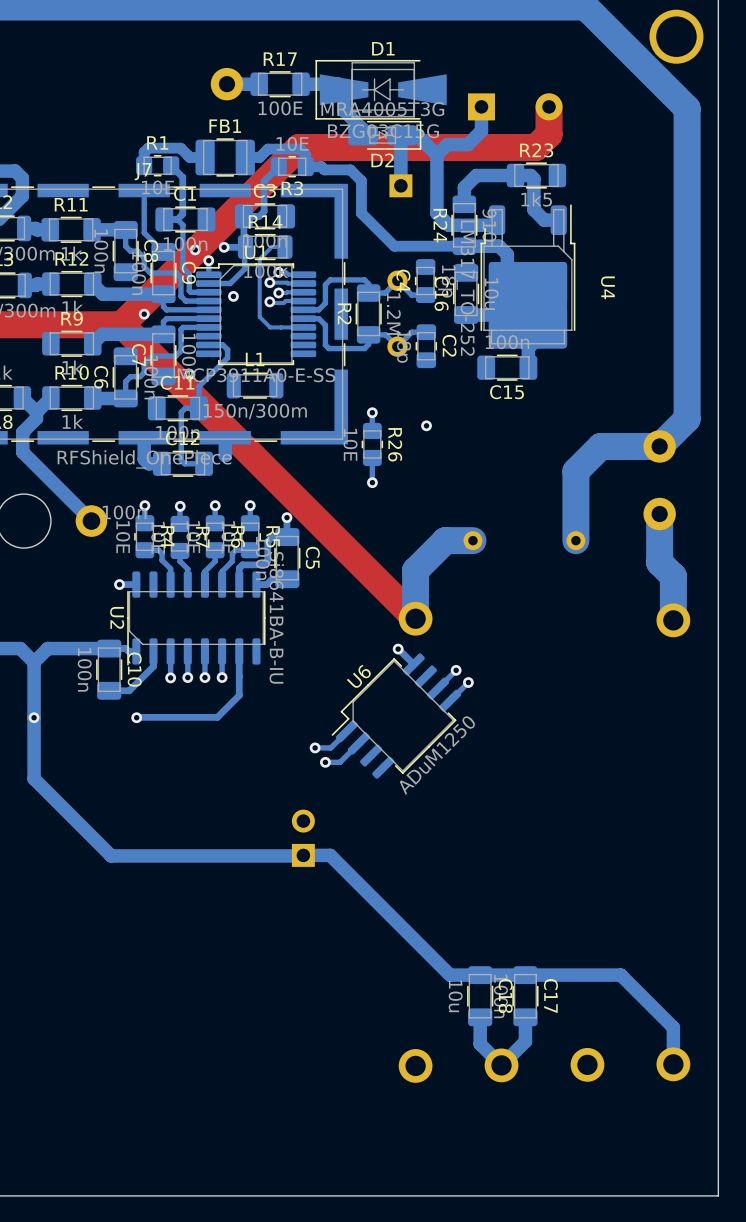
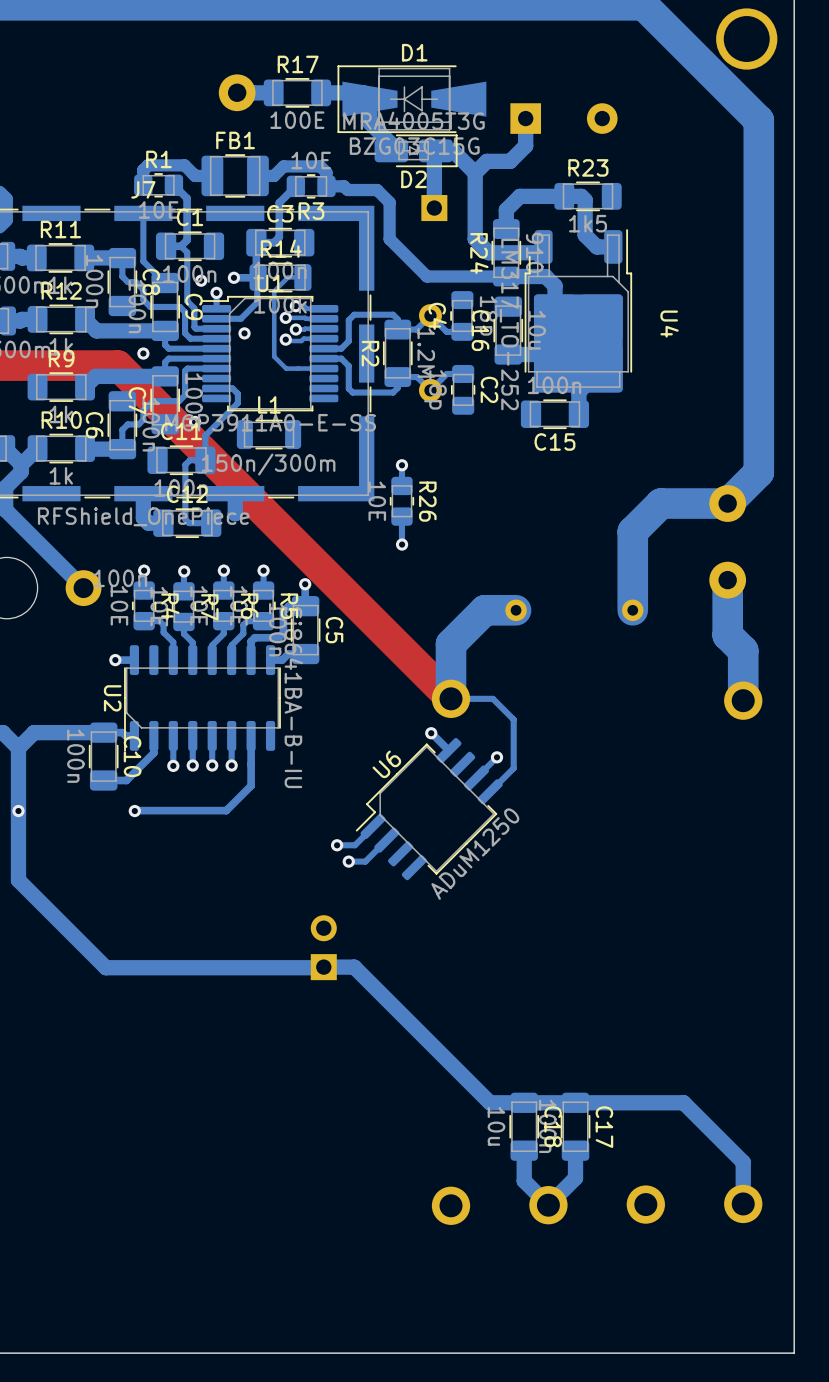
top track: (549, 106) (549, 134) (535, 147) (298, 147) (121, 324) -> none
via: (426, 425) -> none
bottom track: none -> (451, 698) (492, 698) (513, 719) (513, 768) (510, 771)
via: (468, 682) -> none

